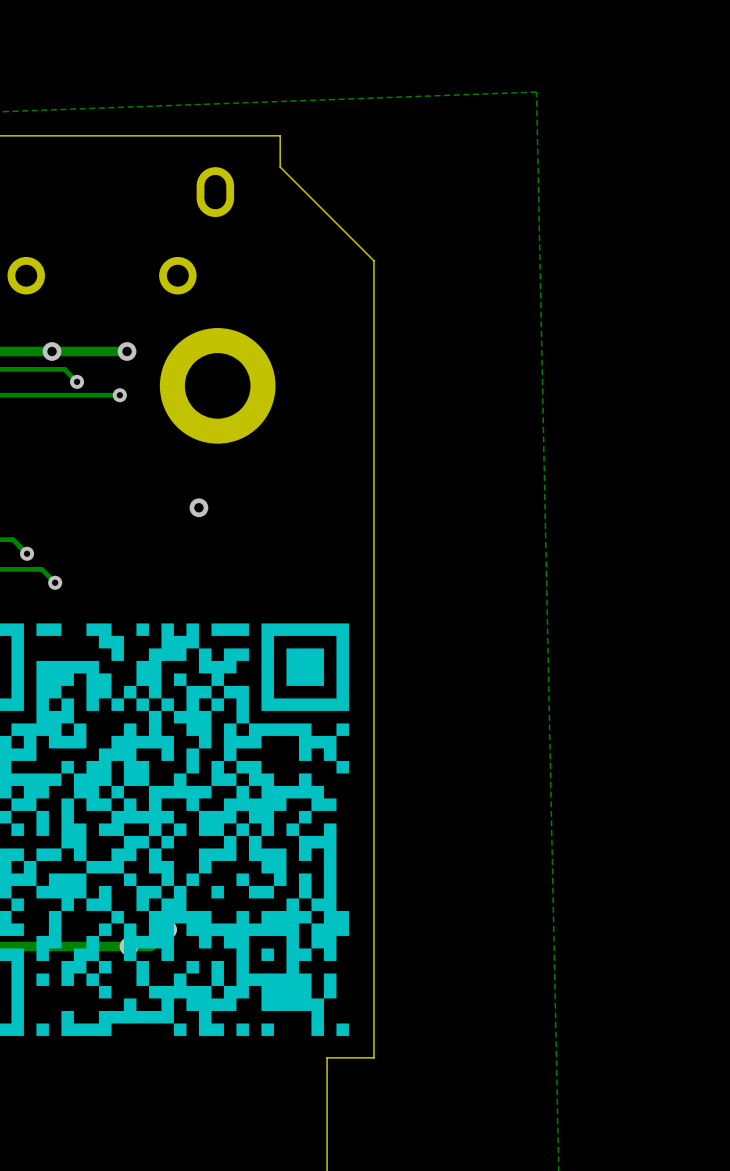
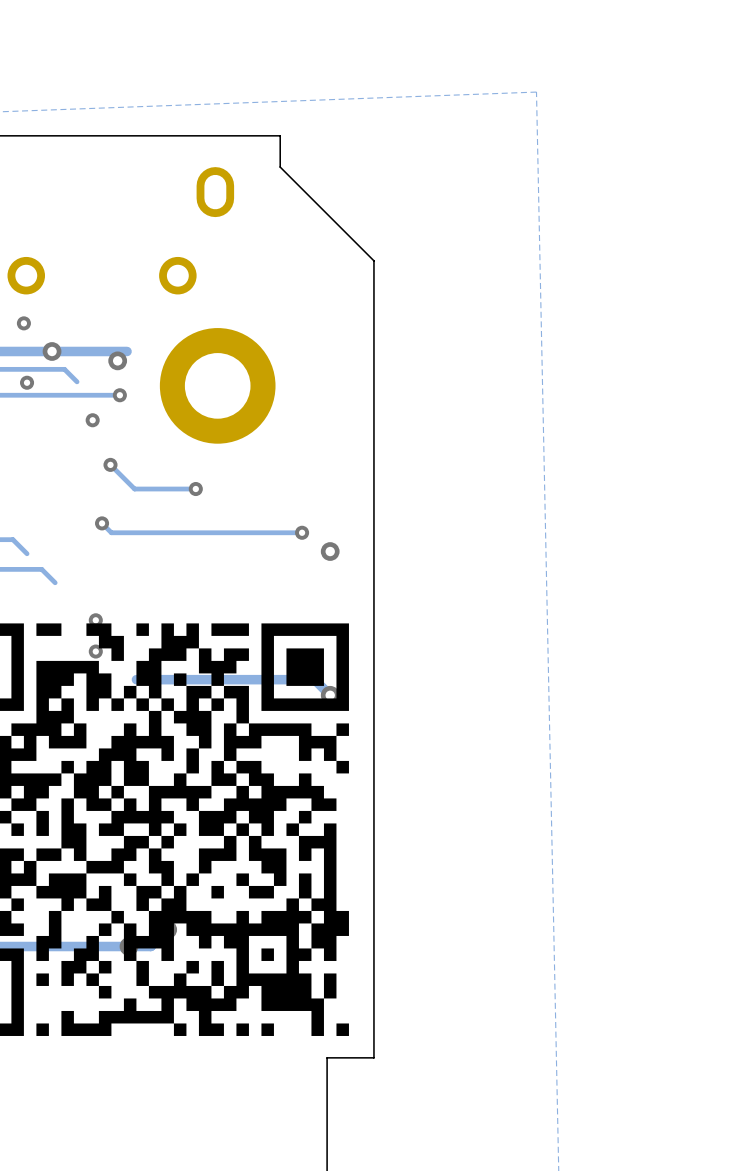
via: none -> (23, 323)
via position: (127, 351) -> (117, 360)
via: (77, 381) -> none
via: none -> (27, 382)
via: none -> (92, 420)
track: none -> (110, 464) (134, 489) (195, 489)
via: none -> (110, 464)
via: none -> (195, 489)
via: (198, 507) -> none
track: none -> (102, 523) (111, 532) (302, 532)
via: none -> (102, 523)
via: none -> (302, 532)
via: none -> (330, 551)
via: (27, 553) -> none
via: (55, 582) -> none
via: none -> (95, 620)
via: none -> (95, 651)
track: none -> (136, 679) (314, 679) (330, 695)
via: none -> (330, 695)

